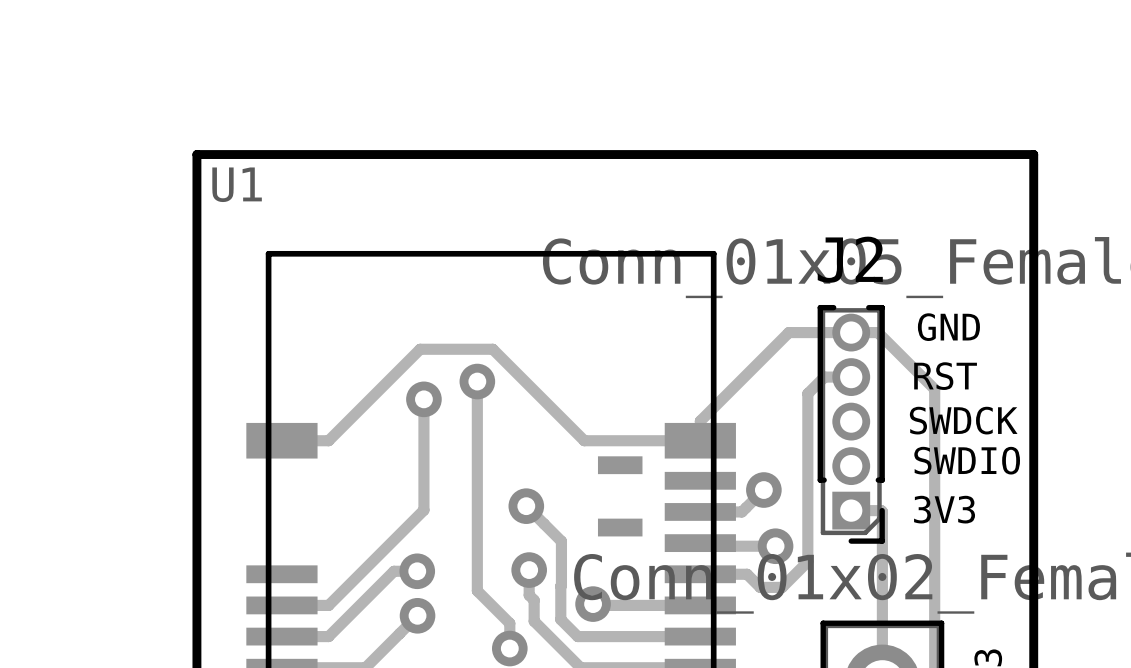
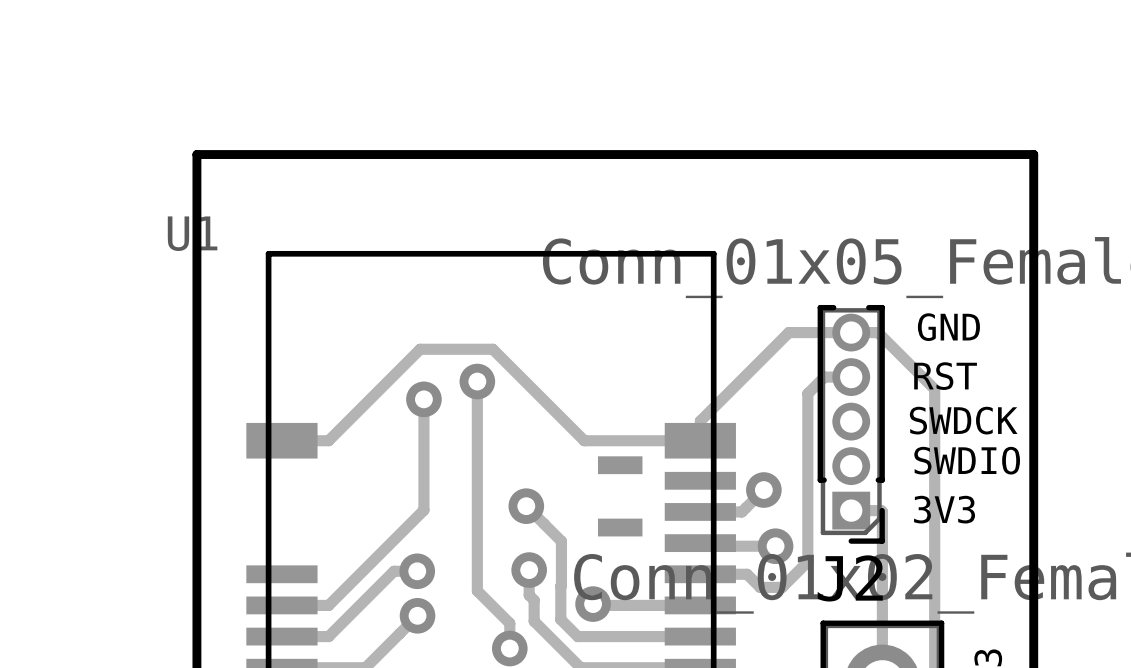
U1 name position: U1 (237, 184) -> U1 (192, 233)
J2 name position: J2 (850, 259) -> J2 (850, 578)

